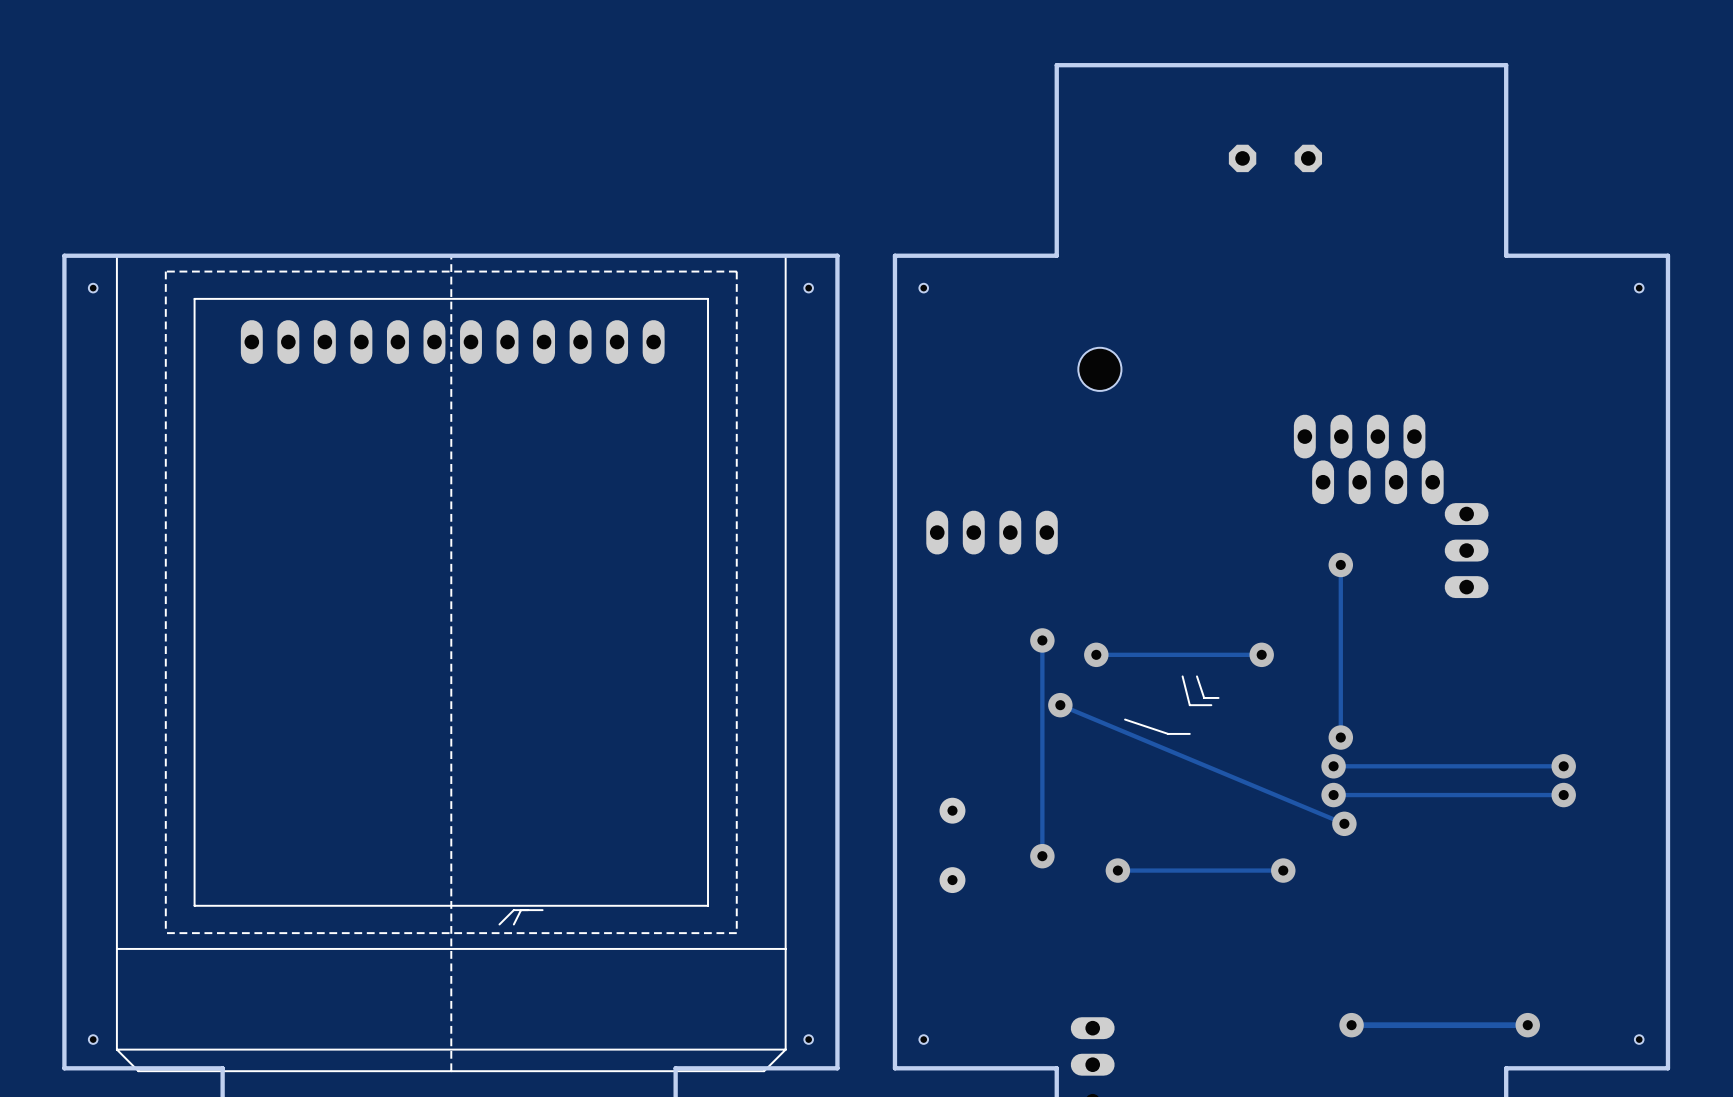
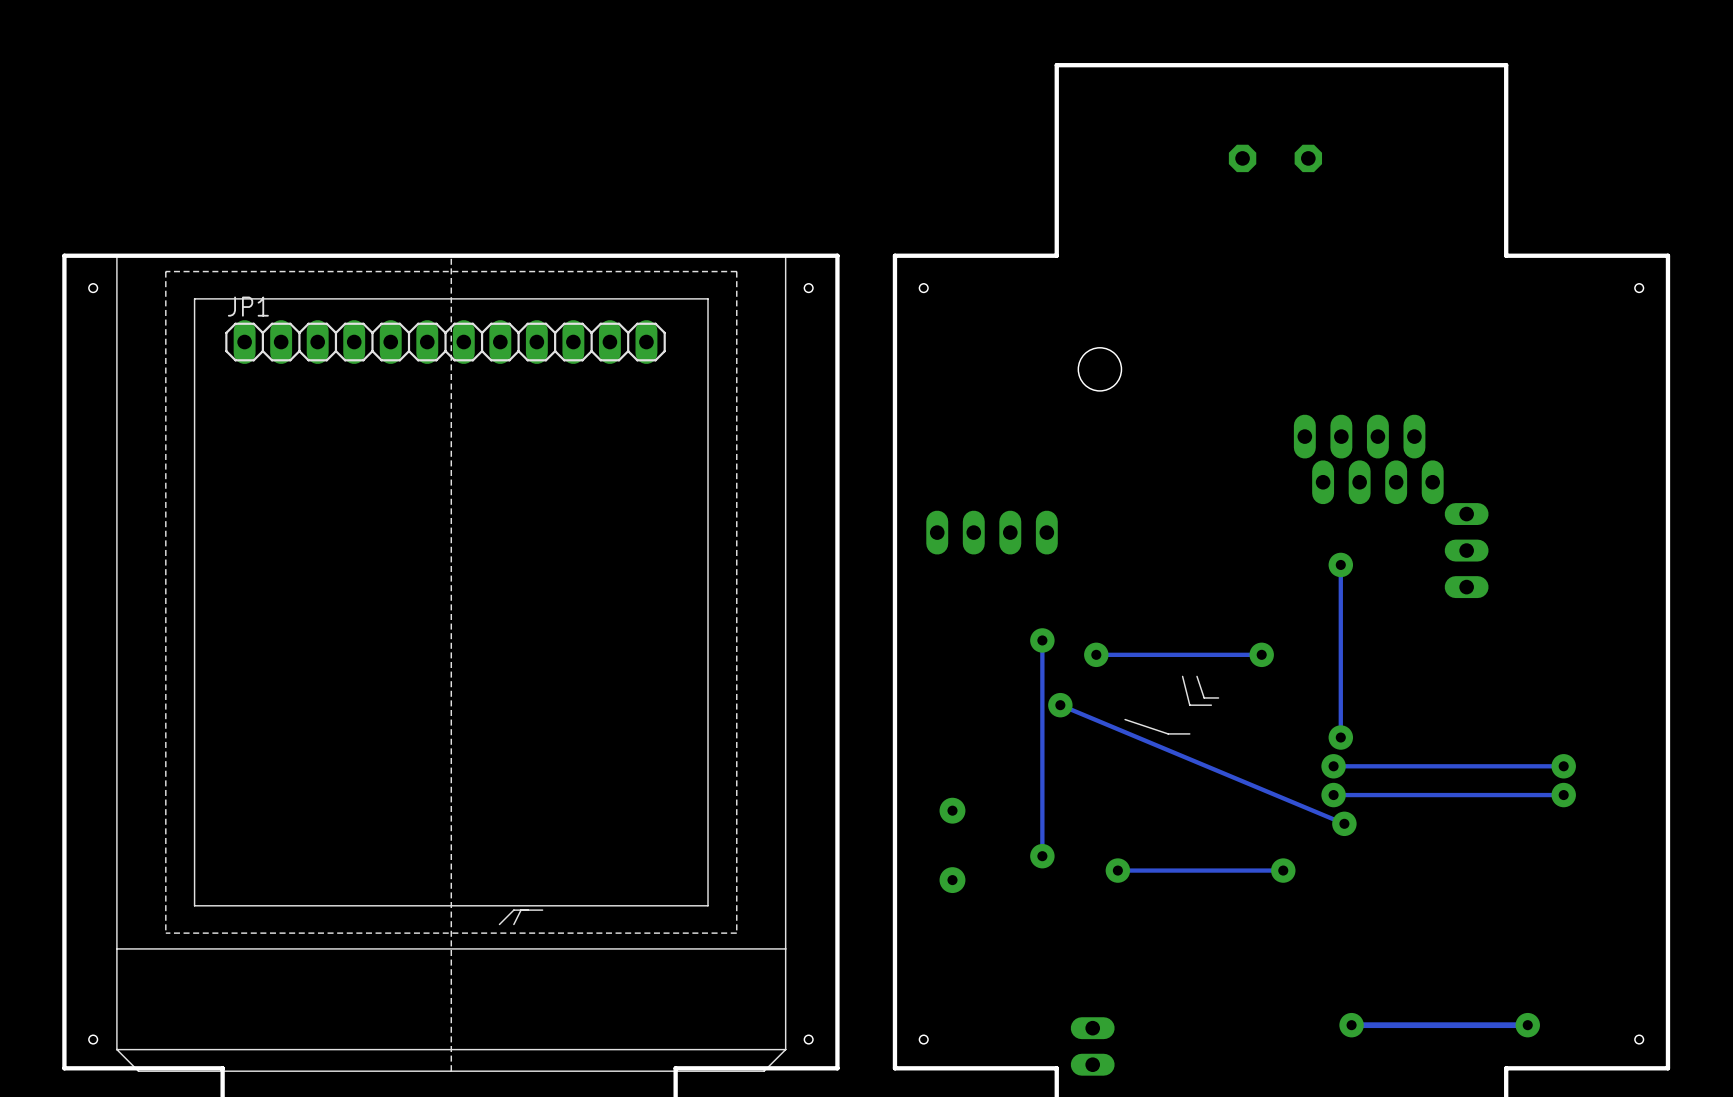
JP1 side: top (452, 342) -> bottom (445, 342)

